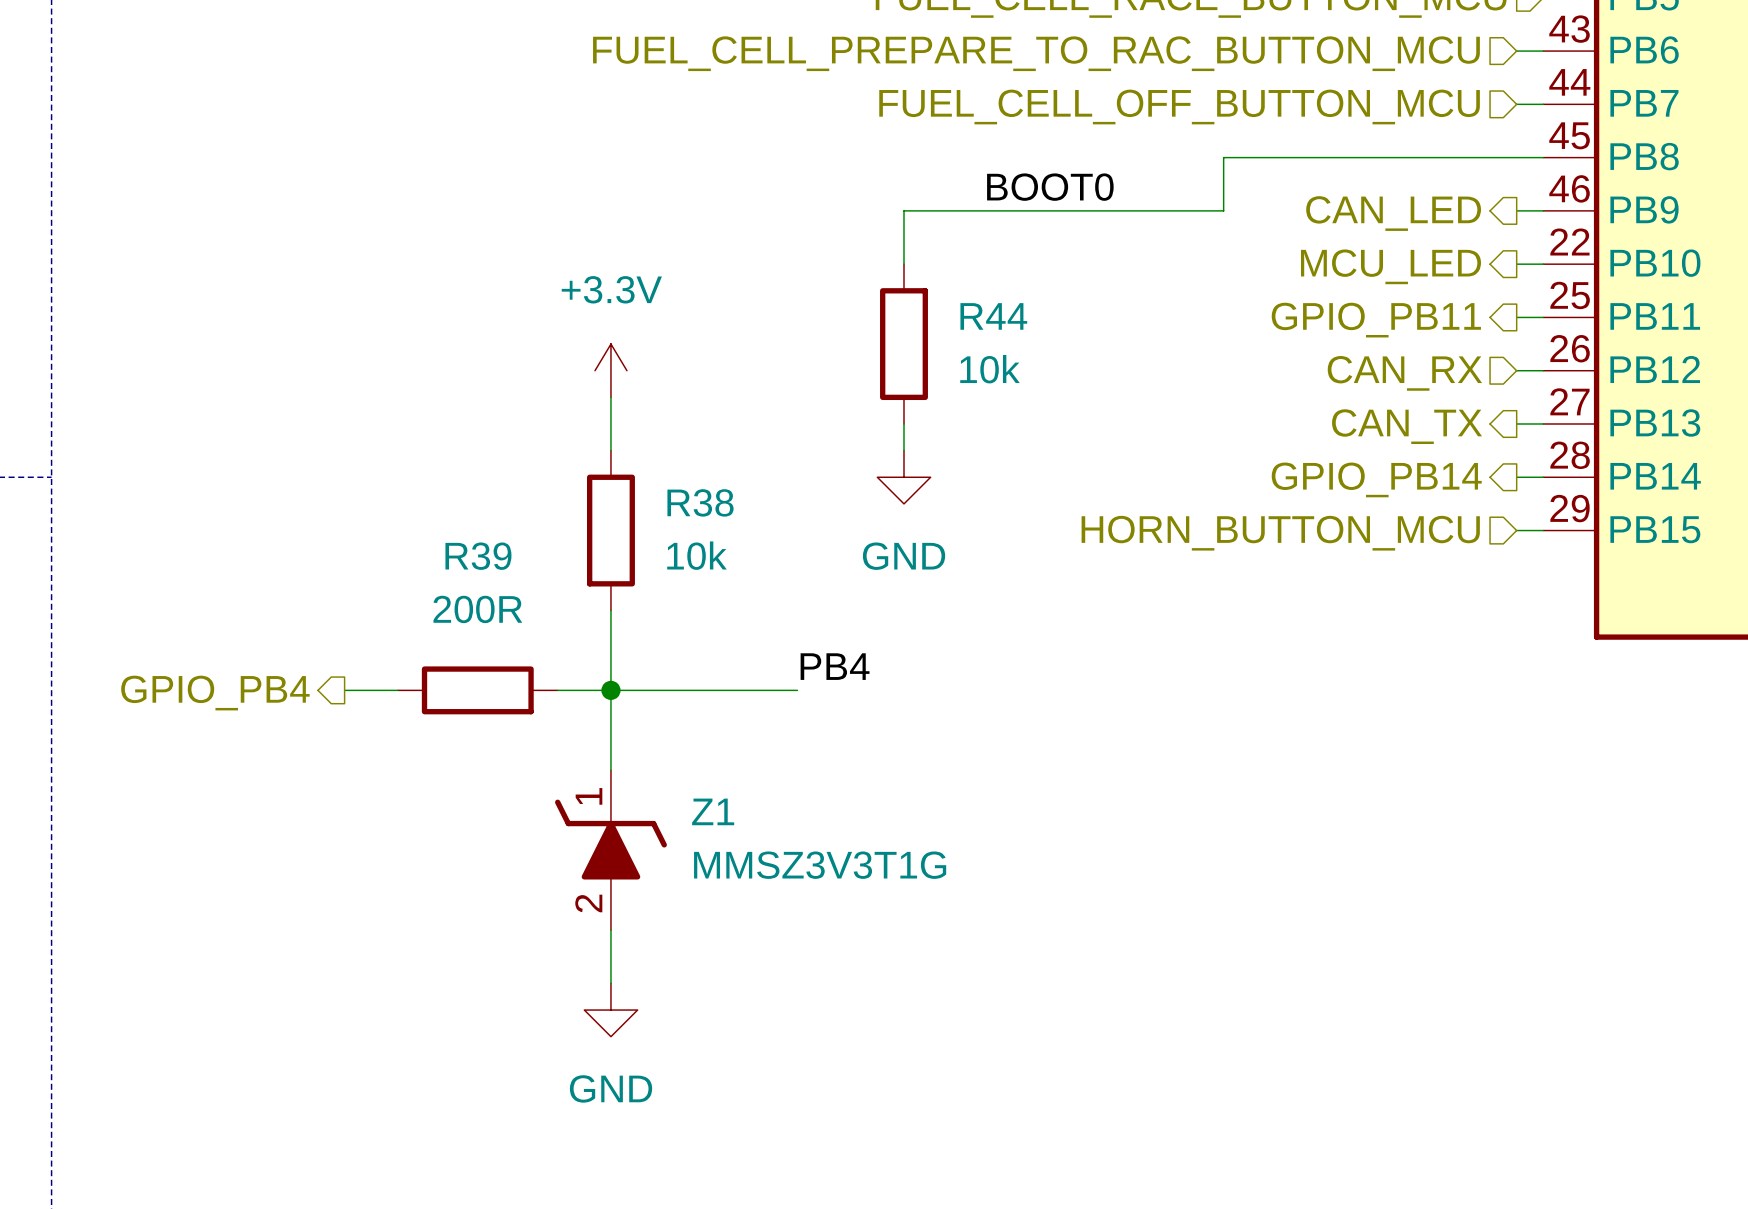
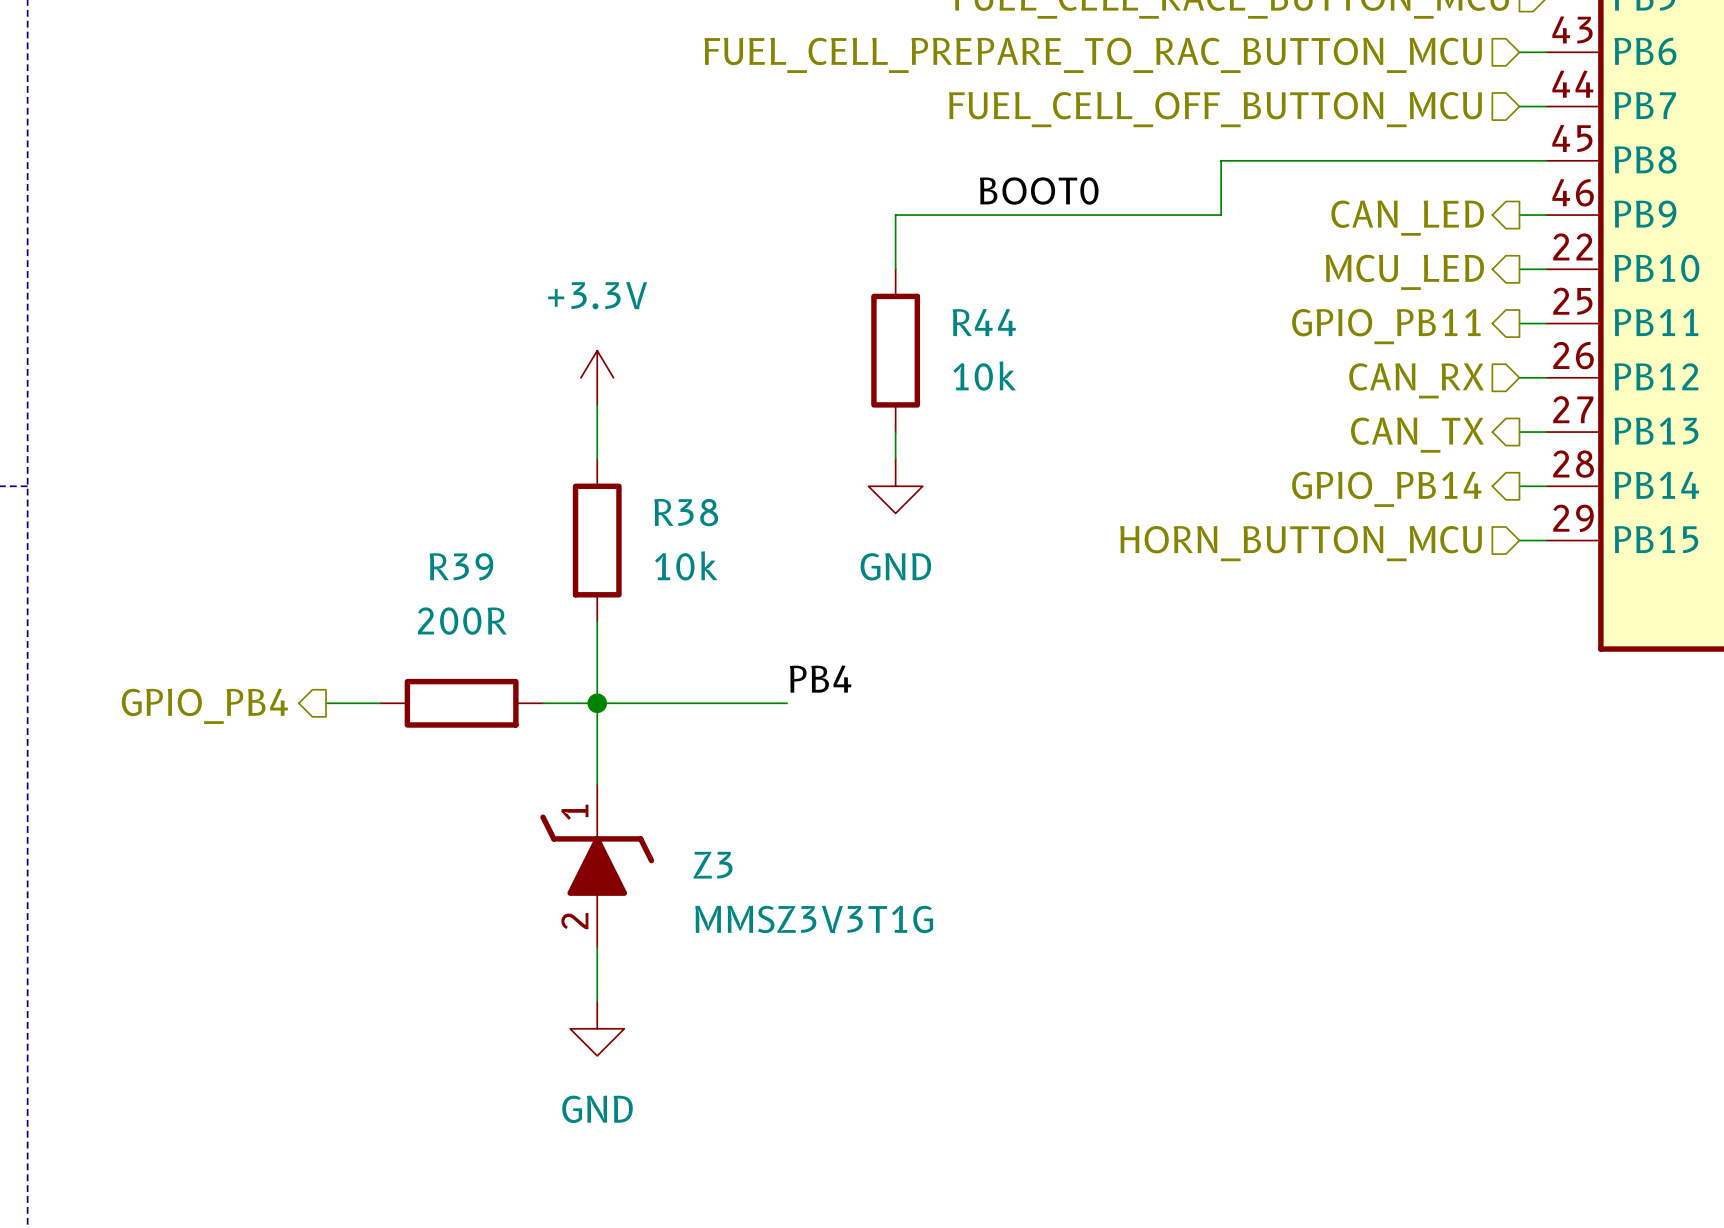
Z1 name: Z1 (713, 811) -> Z3 (712, 865)
Z1 value position: MMSZ3V3T1G (820, 865) -> MMSZ3V3T1G (814, 919)

